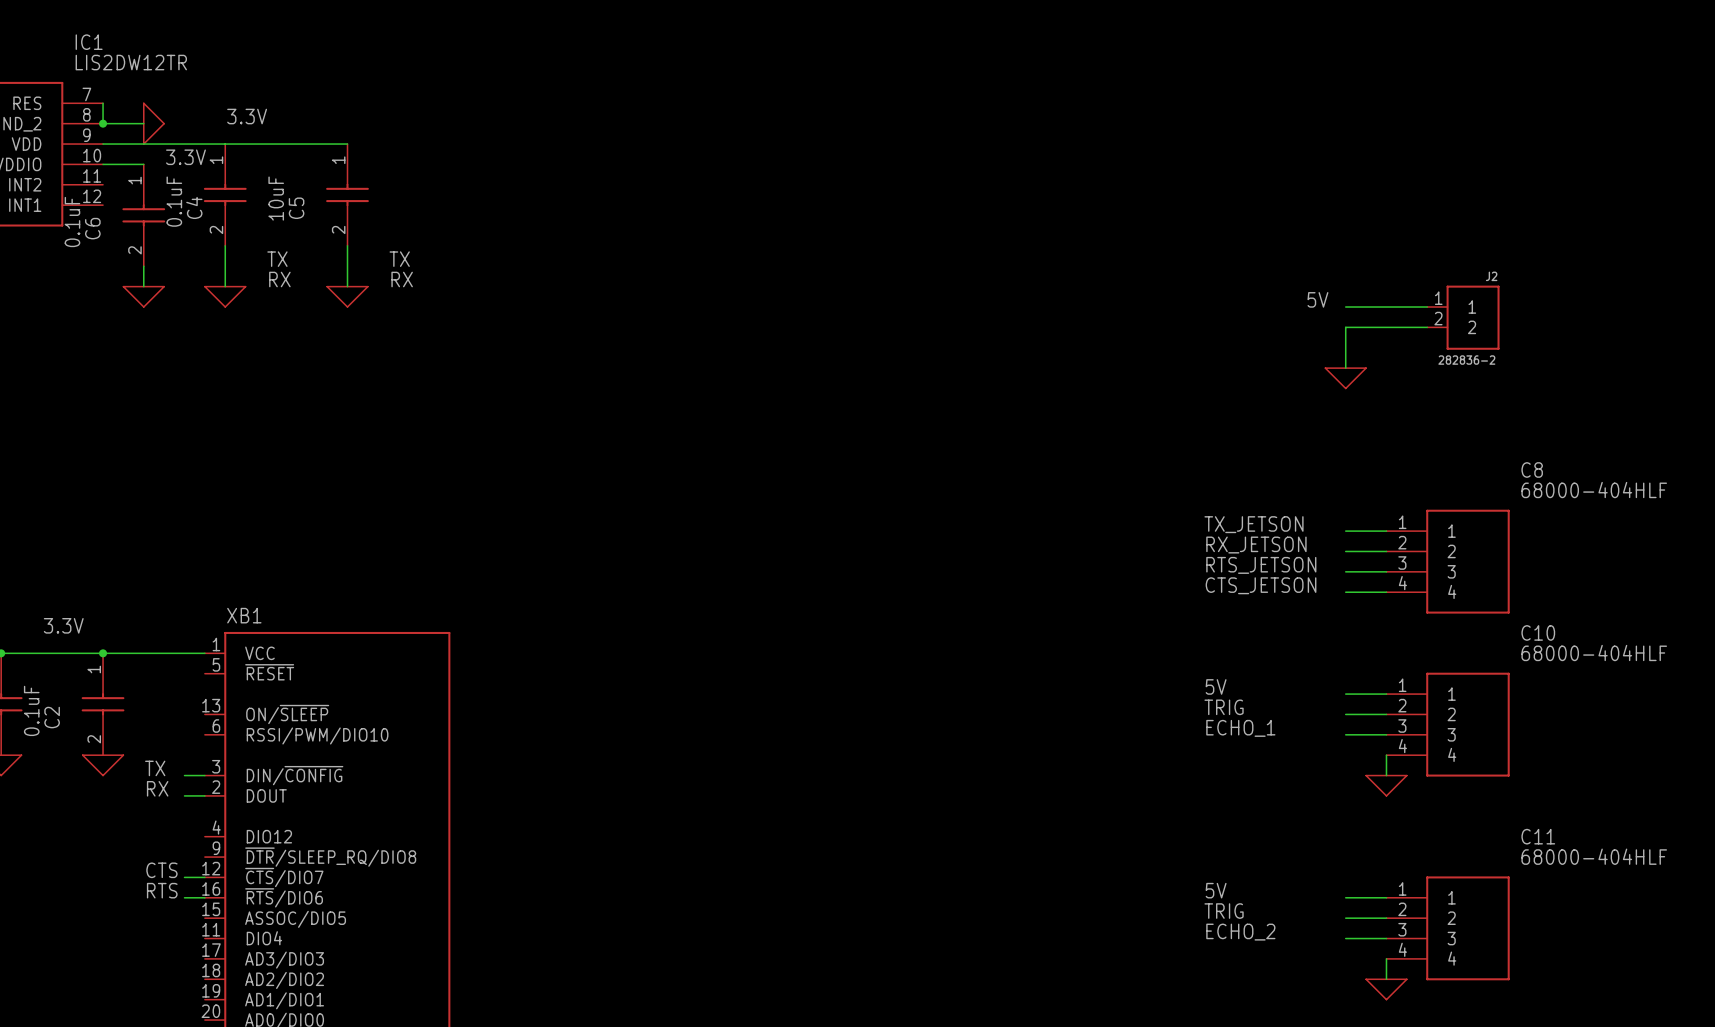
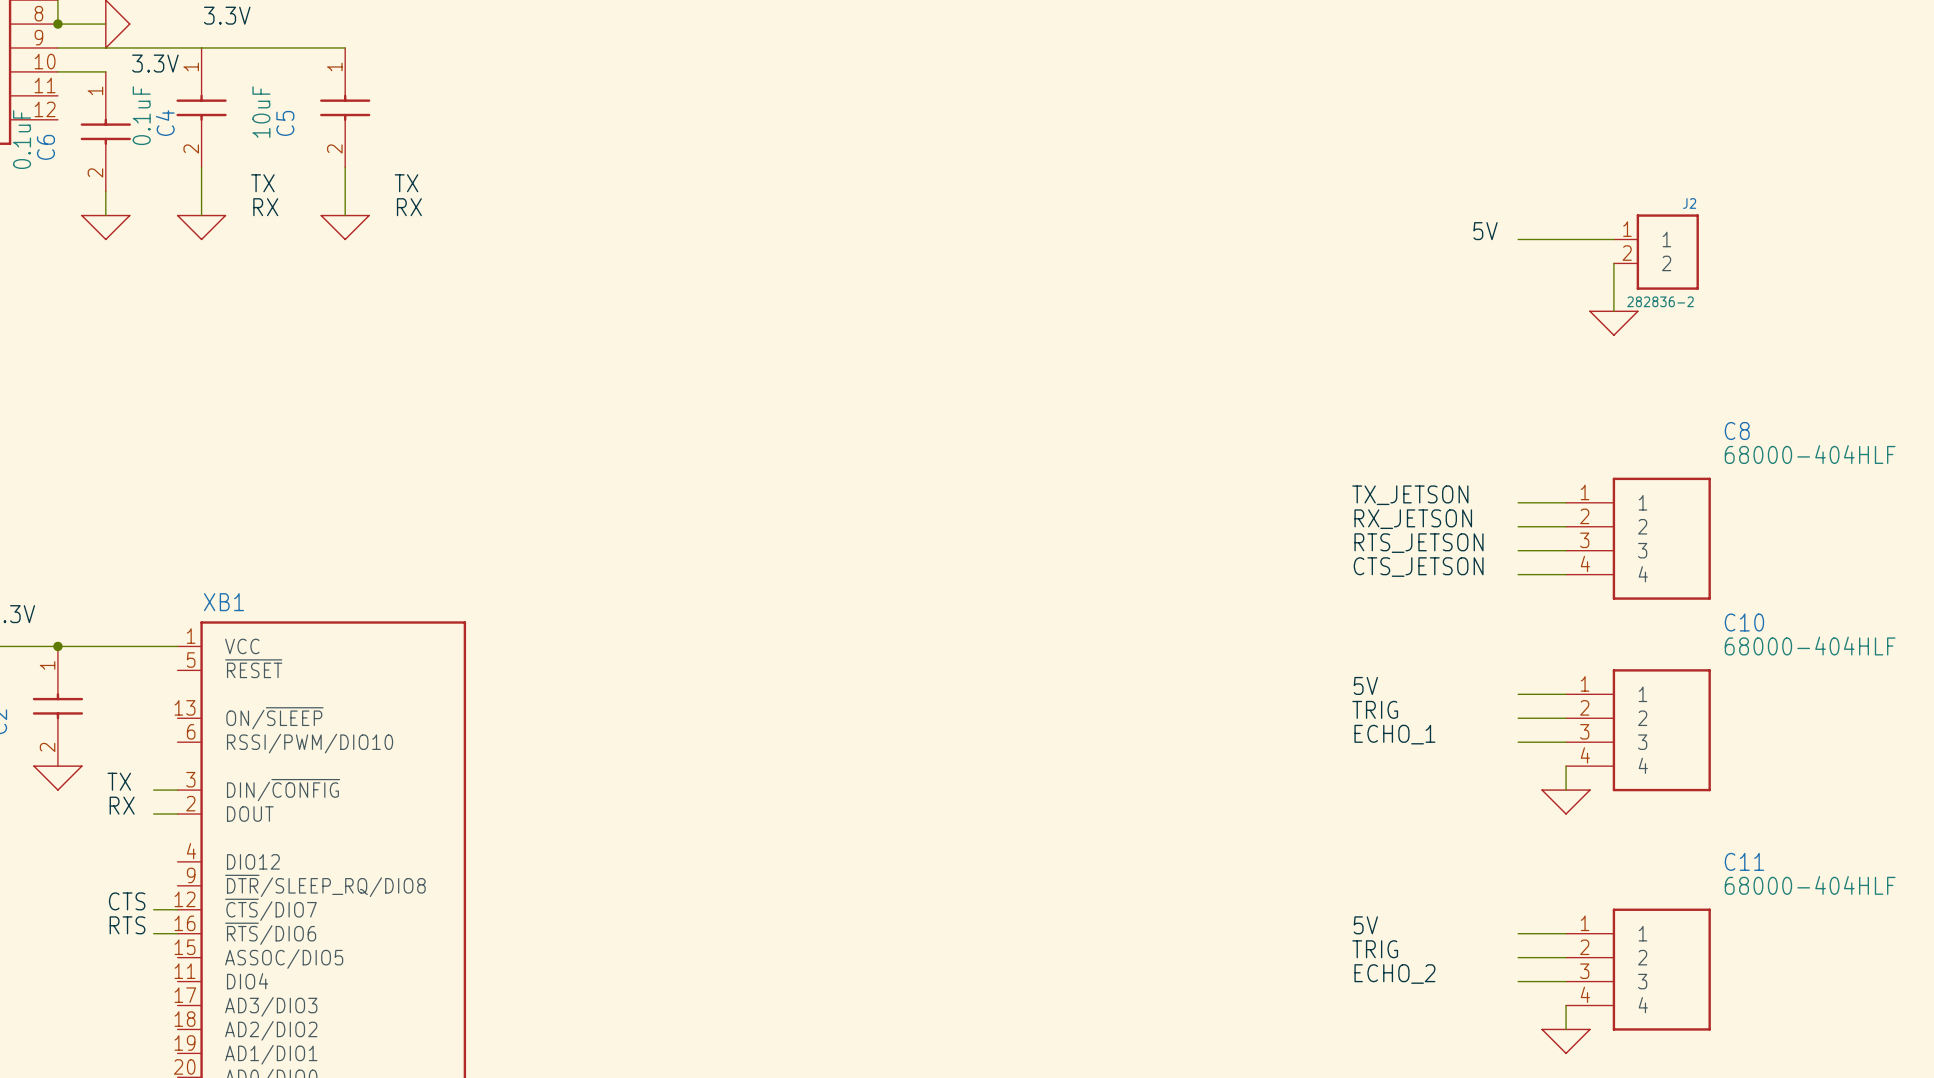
wire: (1427, 327) (1345, 327) (1345, 368) -> (1613, 263) (1613, 311)
power symbol position: (1345, 378) -> (1613, 323)

